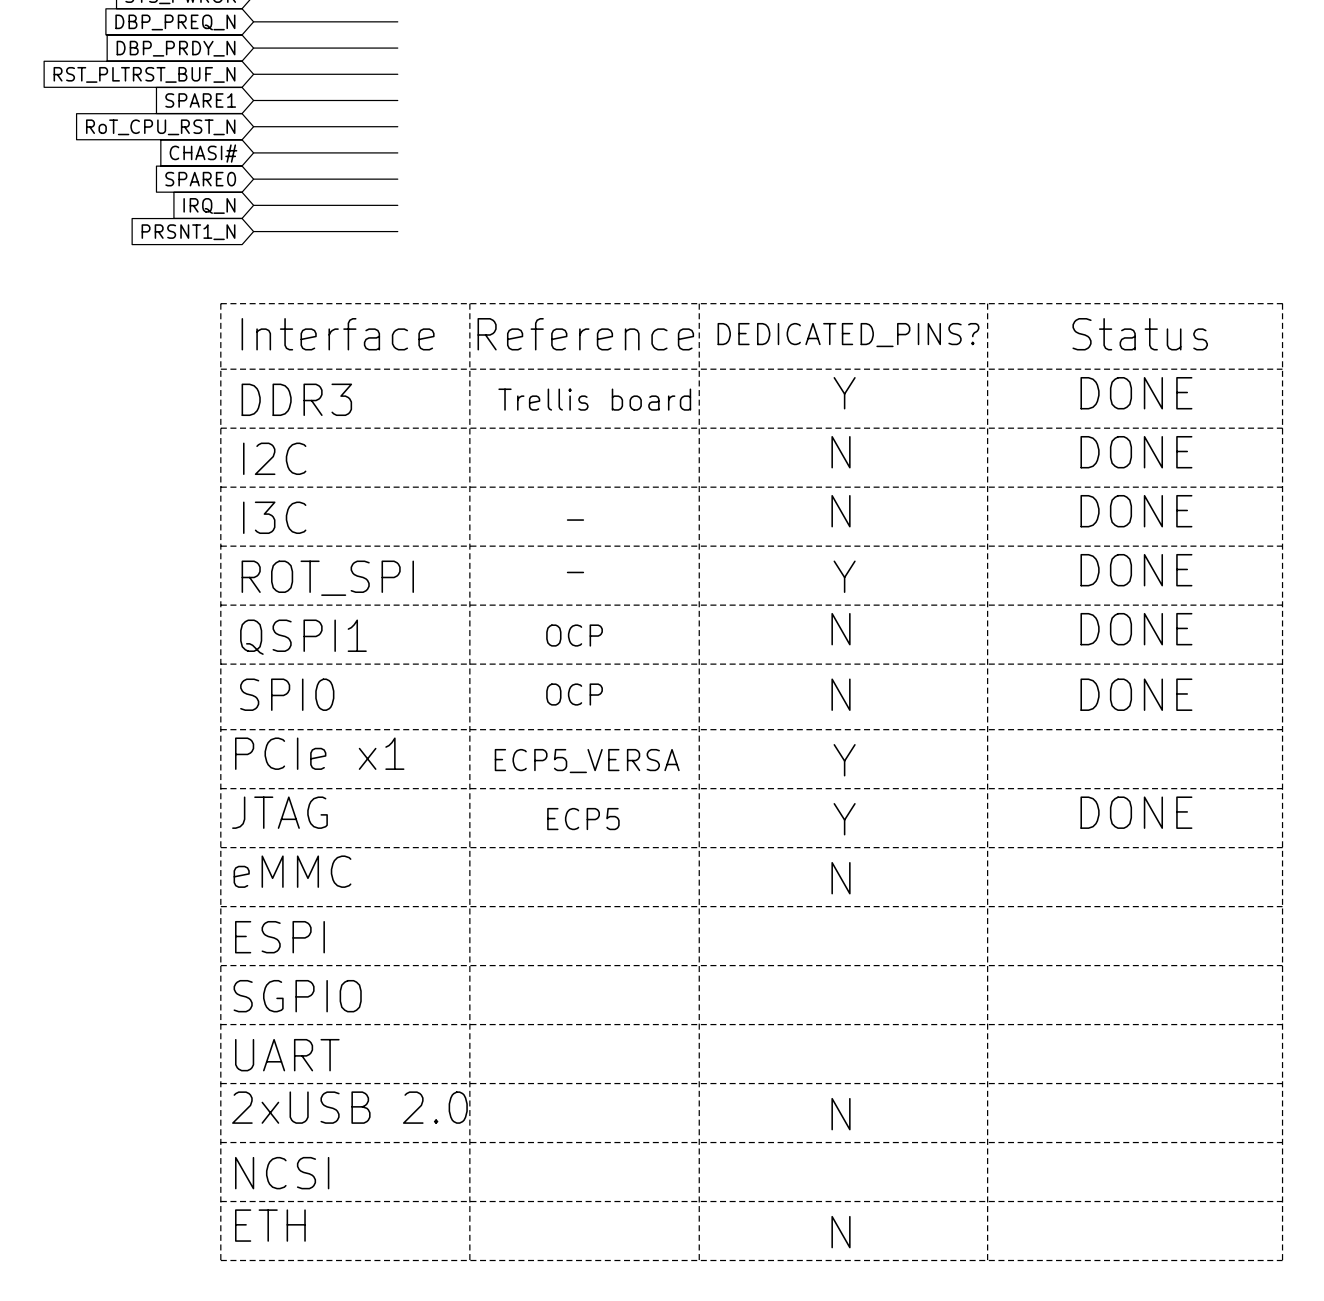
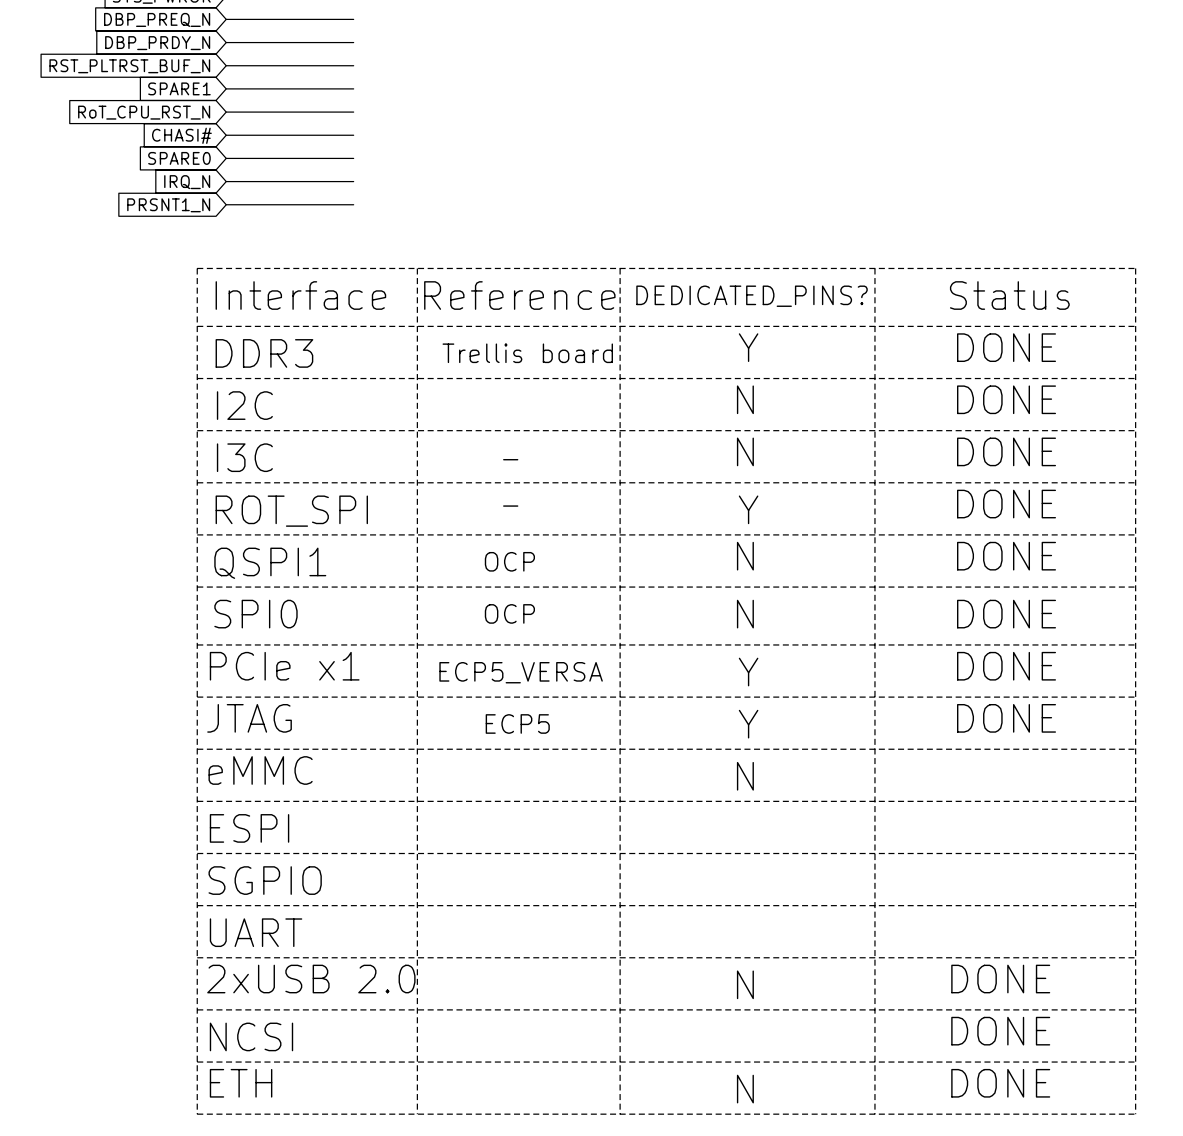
text: none -> DONE (1006, 666)
text: none -> DONE (1000, 979)
text: none -> DONE (1000, 1031)
text: none -> DONE (1000, 1083)

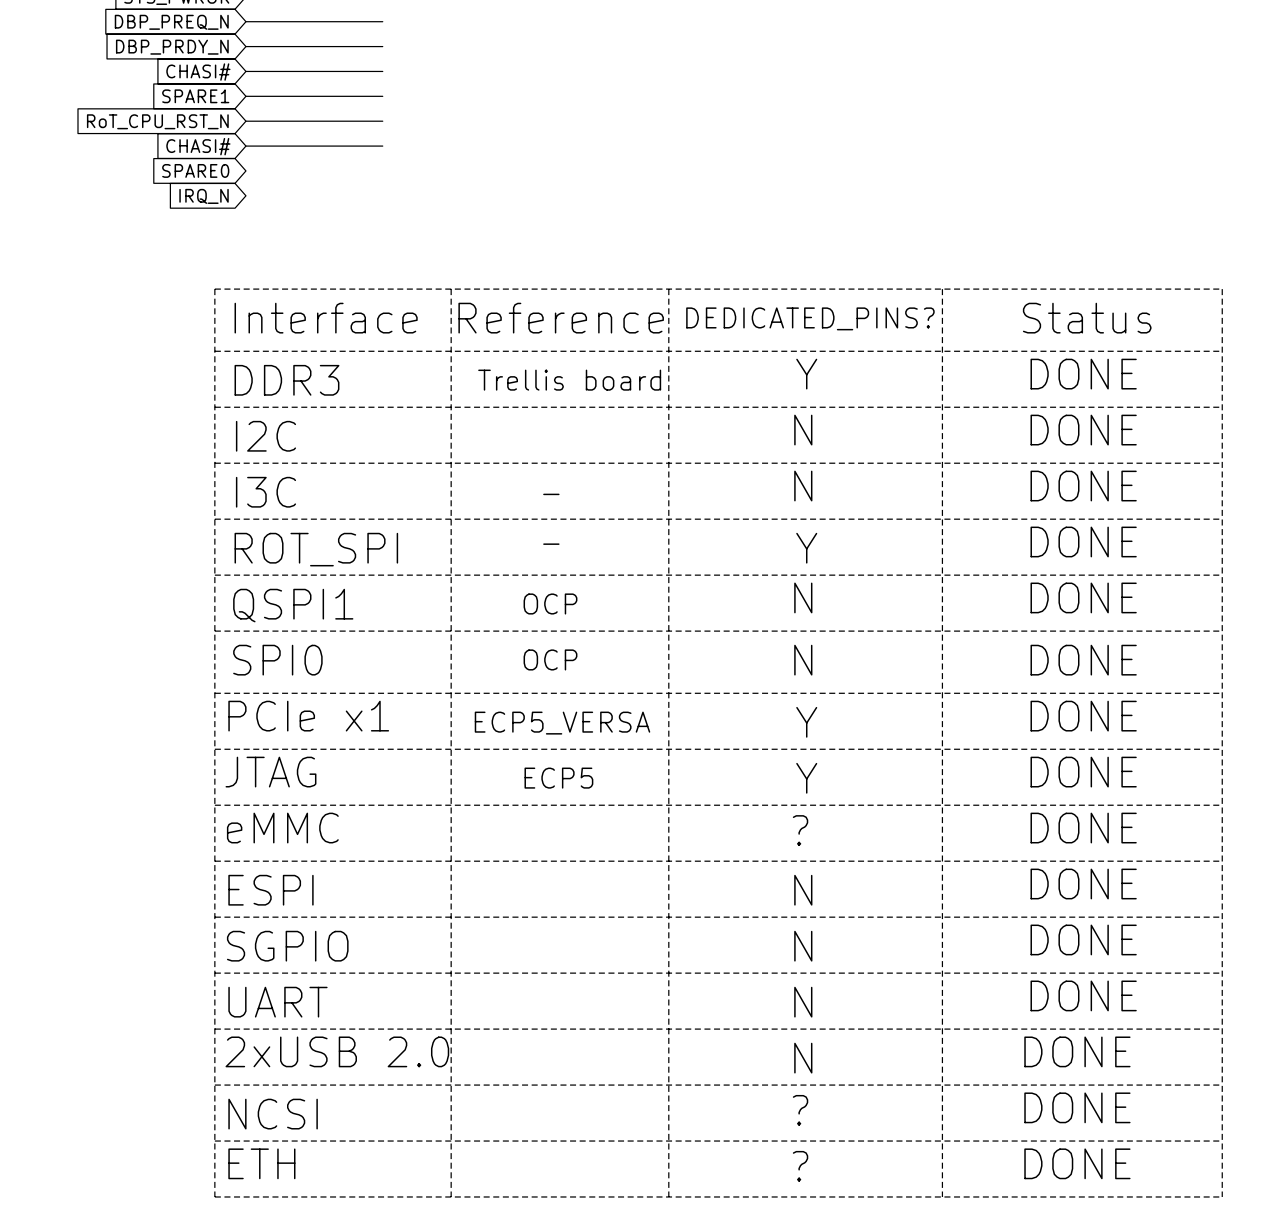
global label: RST_PLTRST_BUF_N (129, 66) -> CHASI# (198, 72)
wire: (226, 158) (353, 158) -> none
wire: (226, 181) (353, 181) -> none
wire: (226, 204) (353, 204) -> none
global label: PRSNT1_N (168, 205) -> none
text: none -> DONE (1083, 828)
text: N (745, 776) -> ? (800, 830)
text: none -> DONE (1083, 884)
text: none -> N (803, 890)
text: none -> DONE (1083, 939)
text: none -> N (803, 946)
text: none -> DONE (1083, 995)
text: none -> N (803, 1002)
text: none -> ? (800, 1110)
text: N (745, 1089) -> ? (800, 1166)

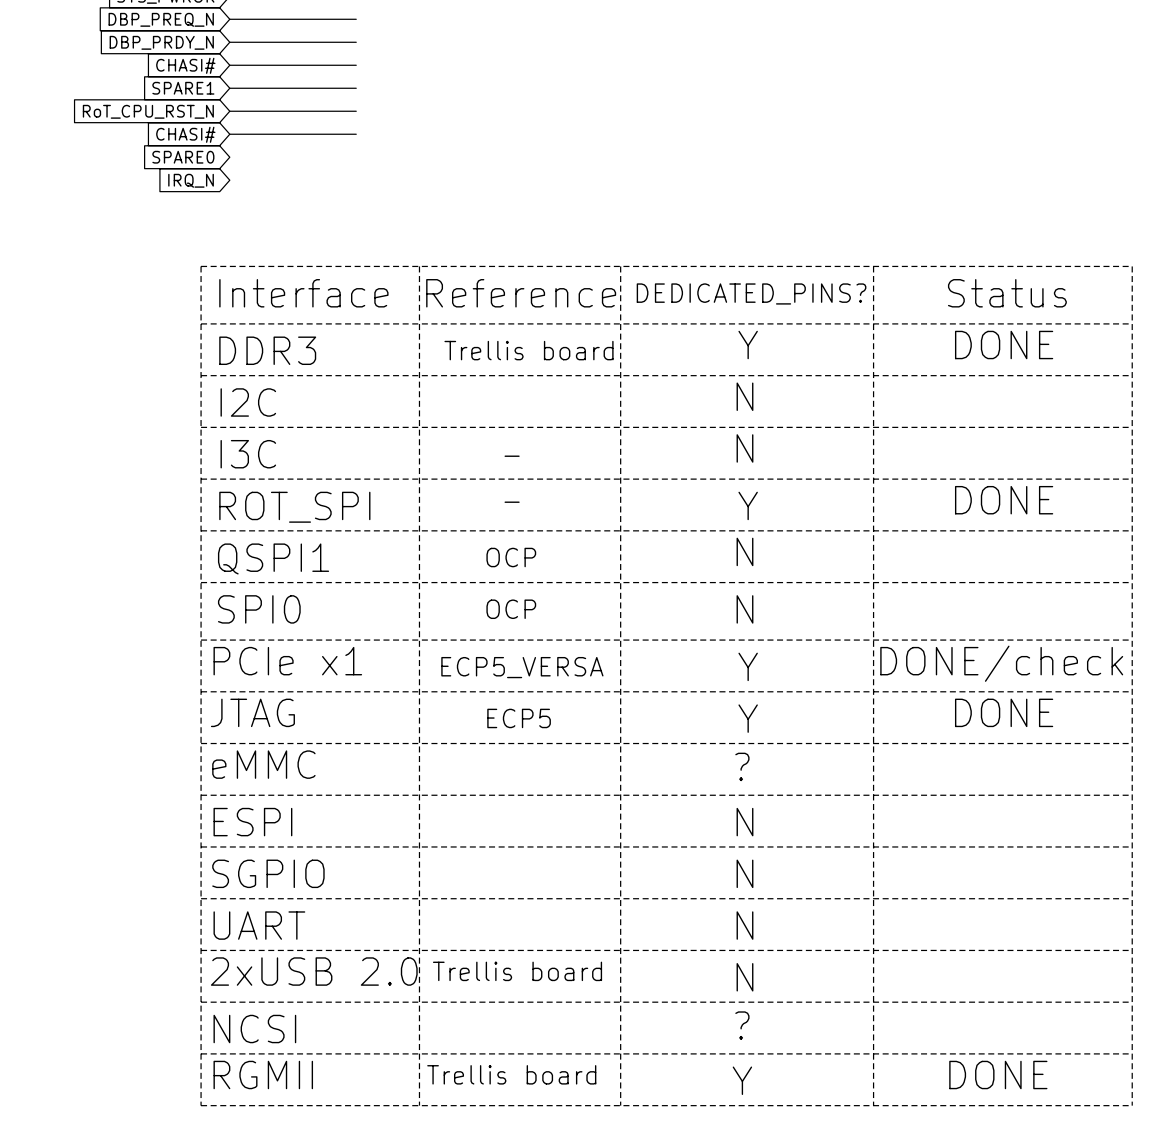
text: DONE (1083, 430) -> none
text: DONE (1083, 486) -> none
text: DONE (1083, 597) -> none
text: DONE (1083, 660) -> none
text: DONE (1083, 716) -> none
text: none -> DONE/check (1001, 663)
text: DONE (1083, 828) -> none
text: DONE (1083, 884) -> none
text: DONE (1083, 939) -> none
text: DONE (1083, 995) -> none
text: none -> Trellis board (517, 971)
text: DONE (1077, 1051) -> none
text: DONE (1077, 1107) -> none
text: ETH (261, 1163) -> RGMII (263, 1075)
text: none -> Trellis board (511, 1074)
text: ? (800, 1166) -> Y (742, 1080)

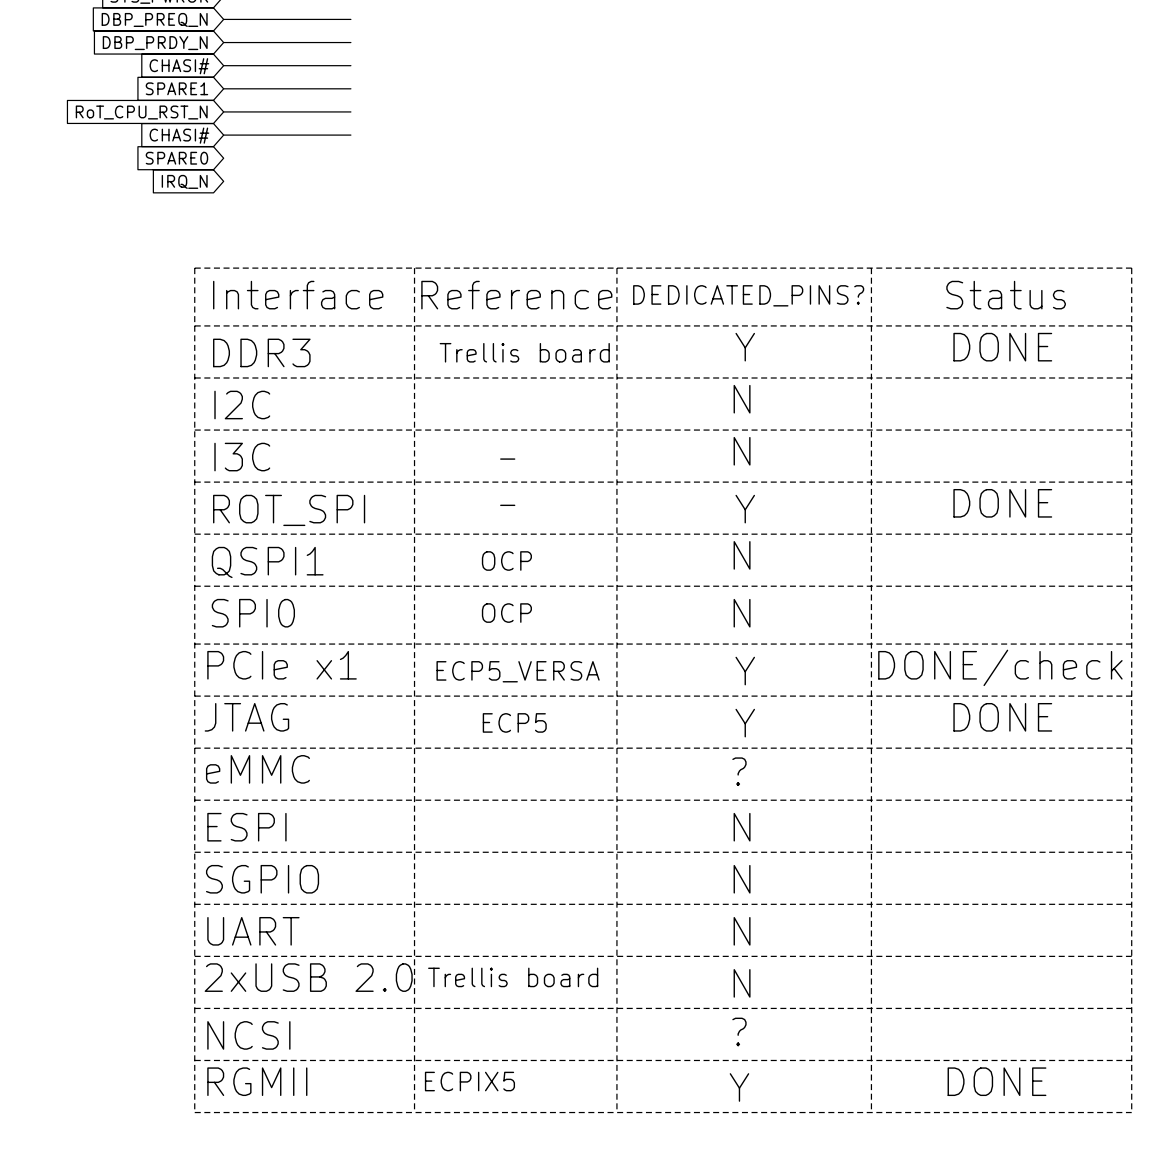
text: Trellis board (511, 1074) -> ECPIX5 (469, 1081)

